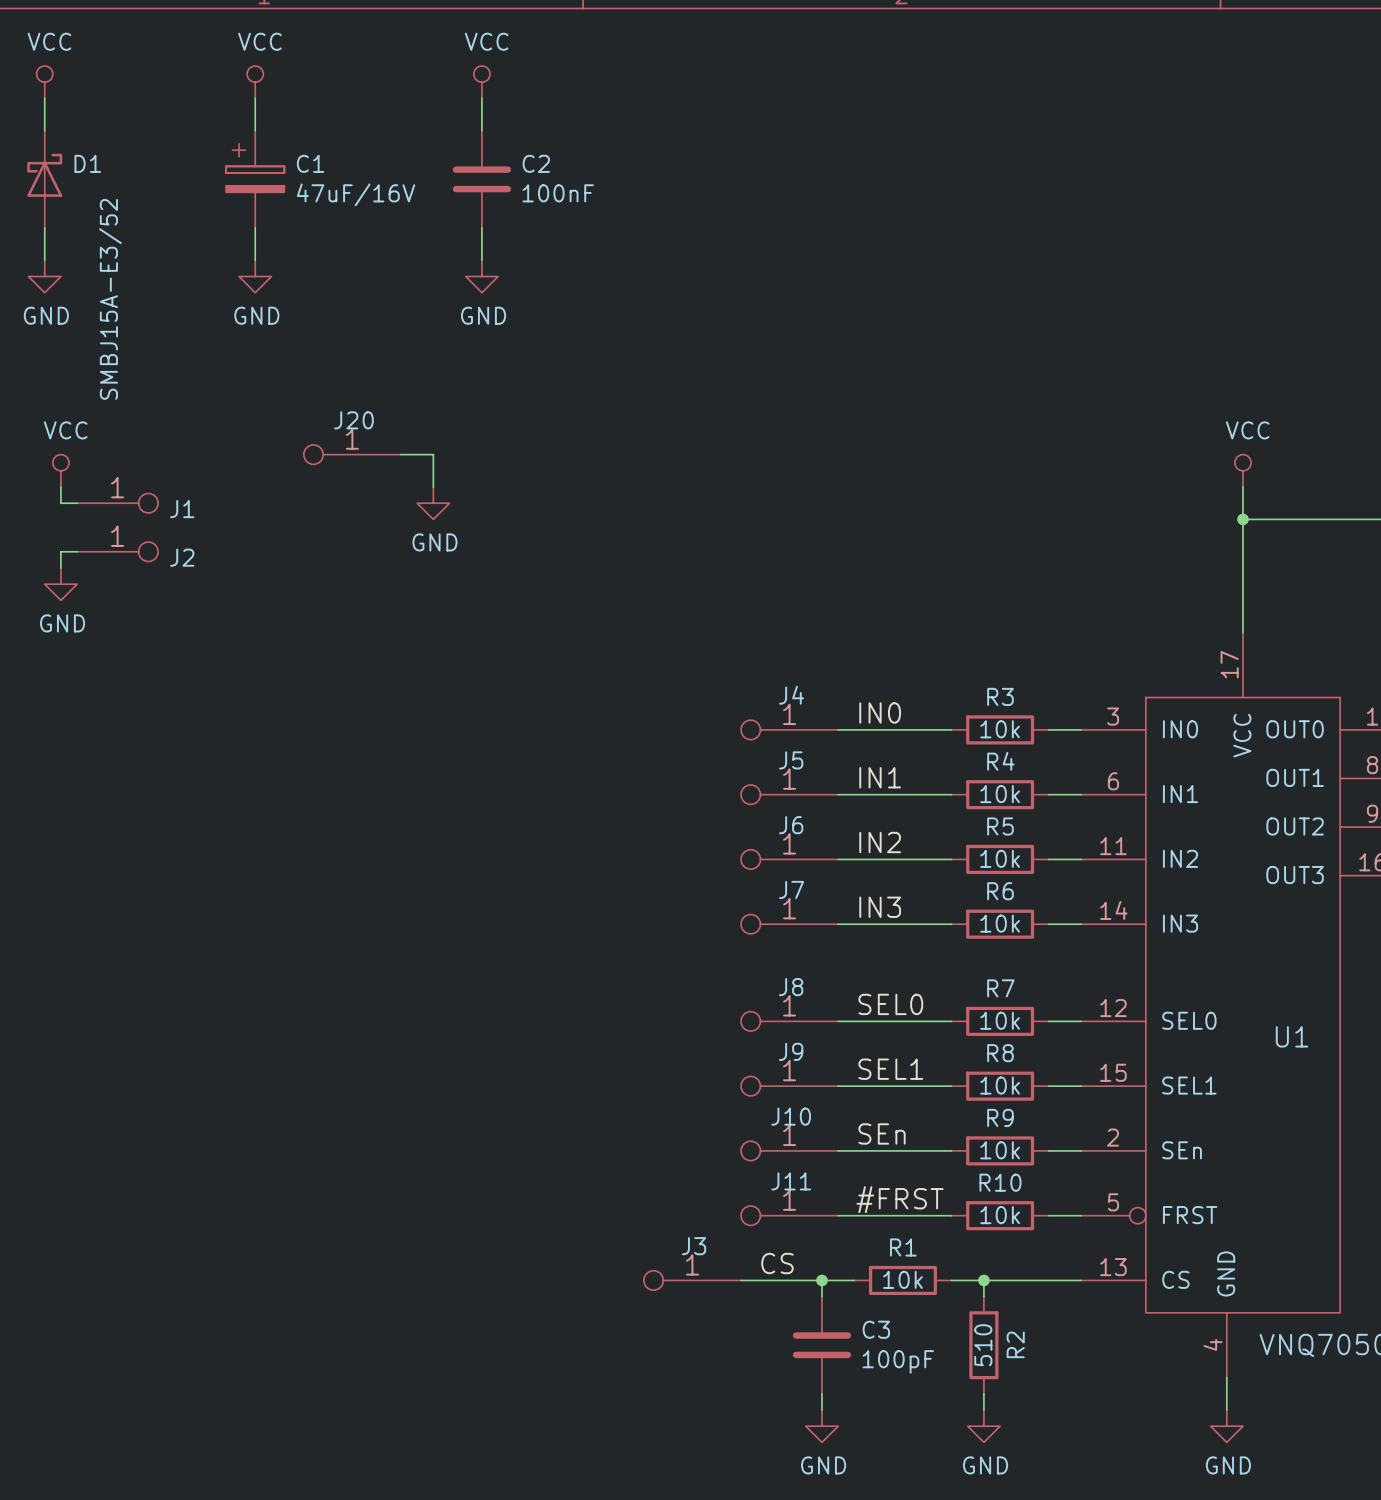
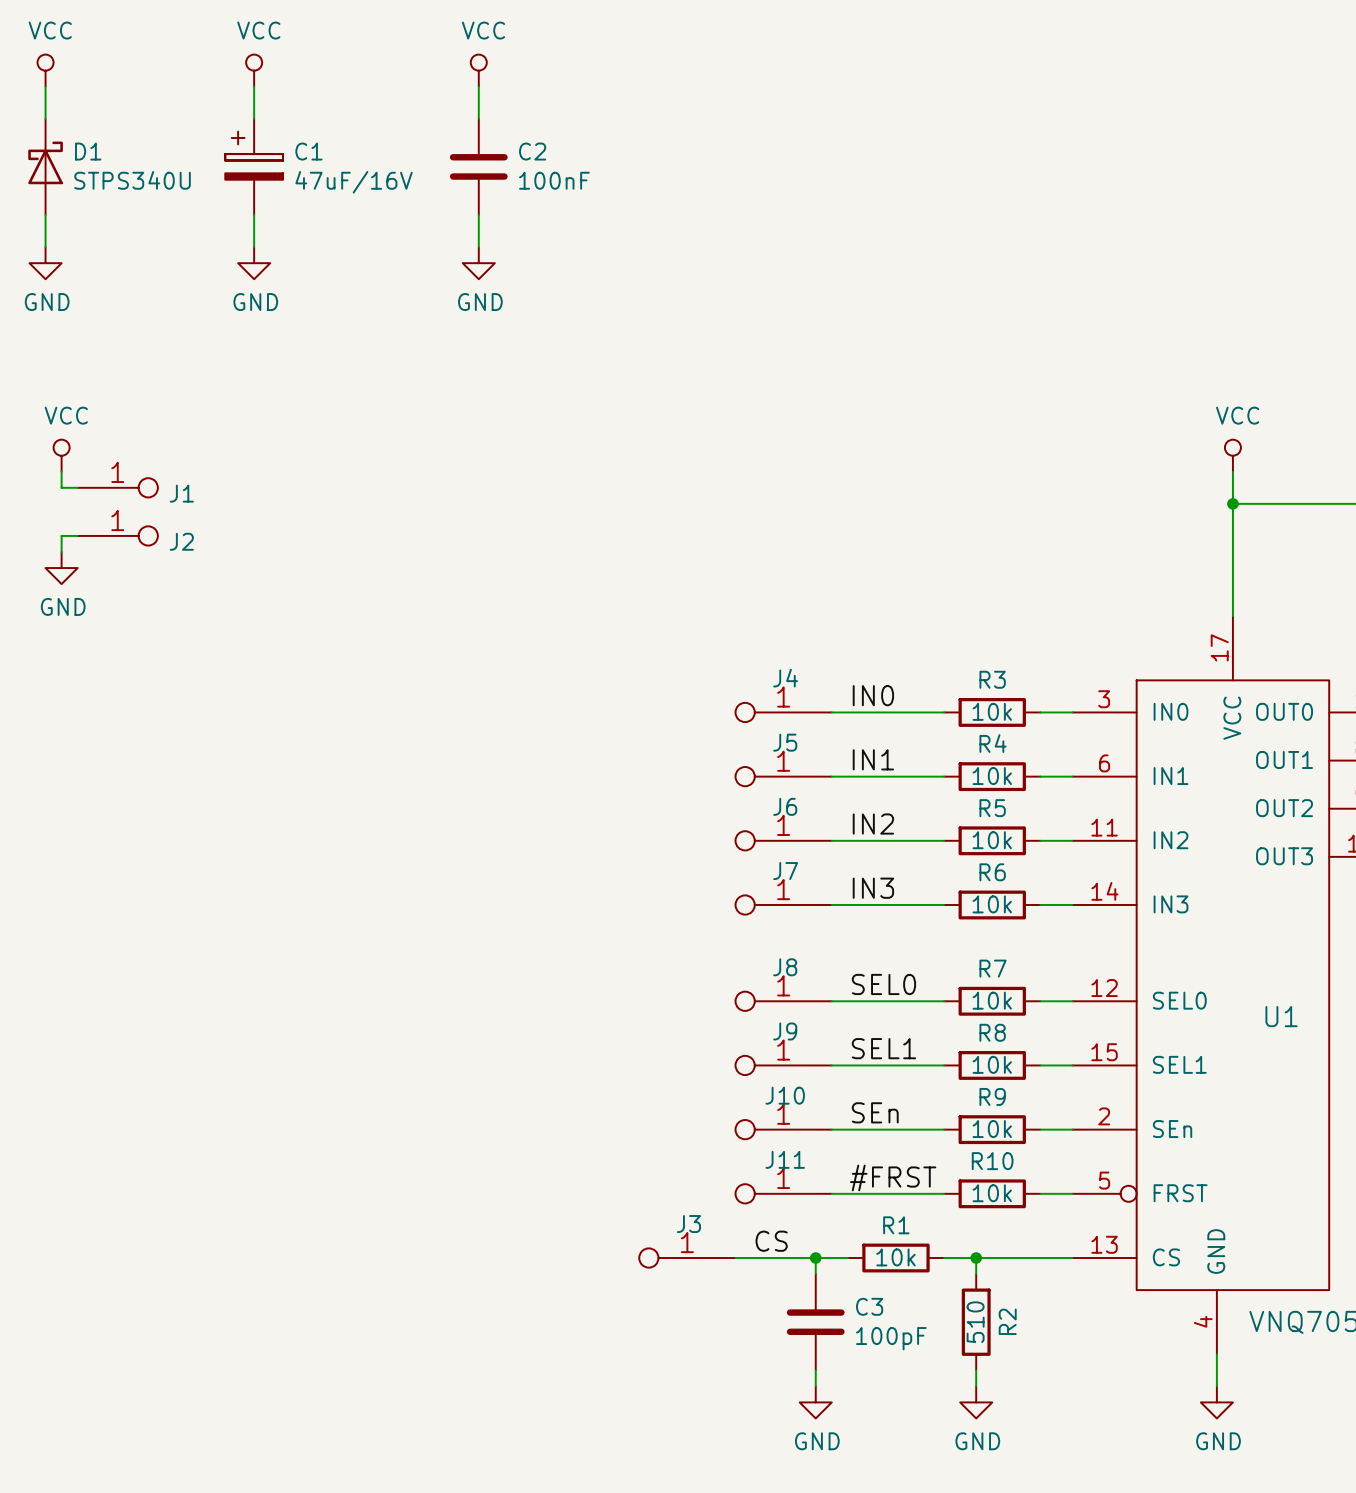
D1 value: SMBJ15A-E3/52 (110, 299) -> STPS340U (132, 180)
J20: (352, 454) -> none
wire: (400, 454) (433, 454) (433, 487) -> none
power symbol: GND (433, 503) -> none

